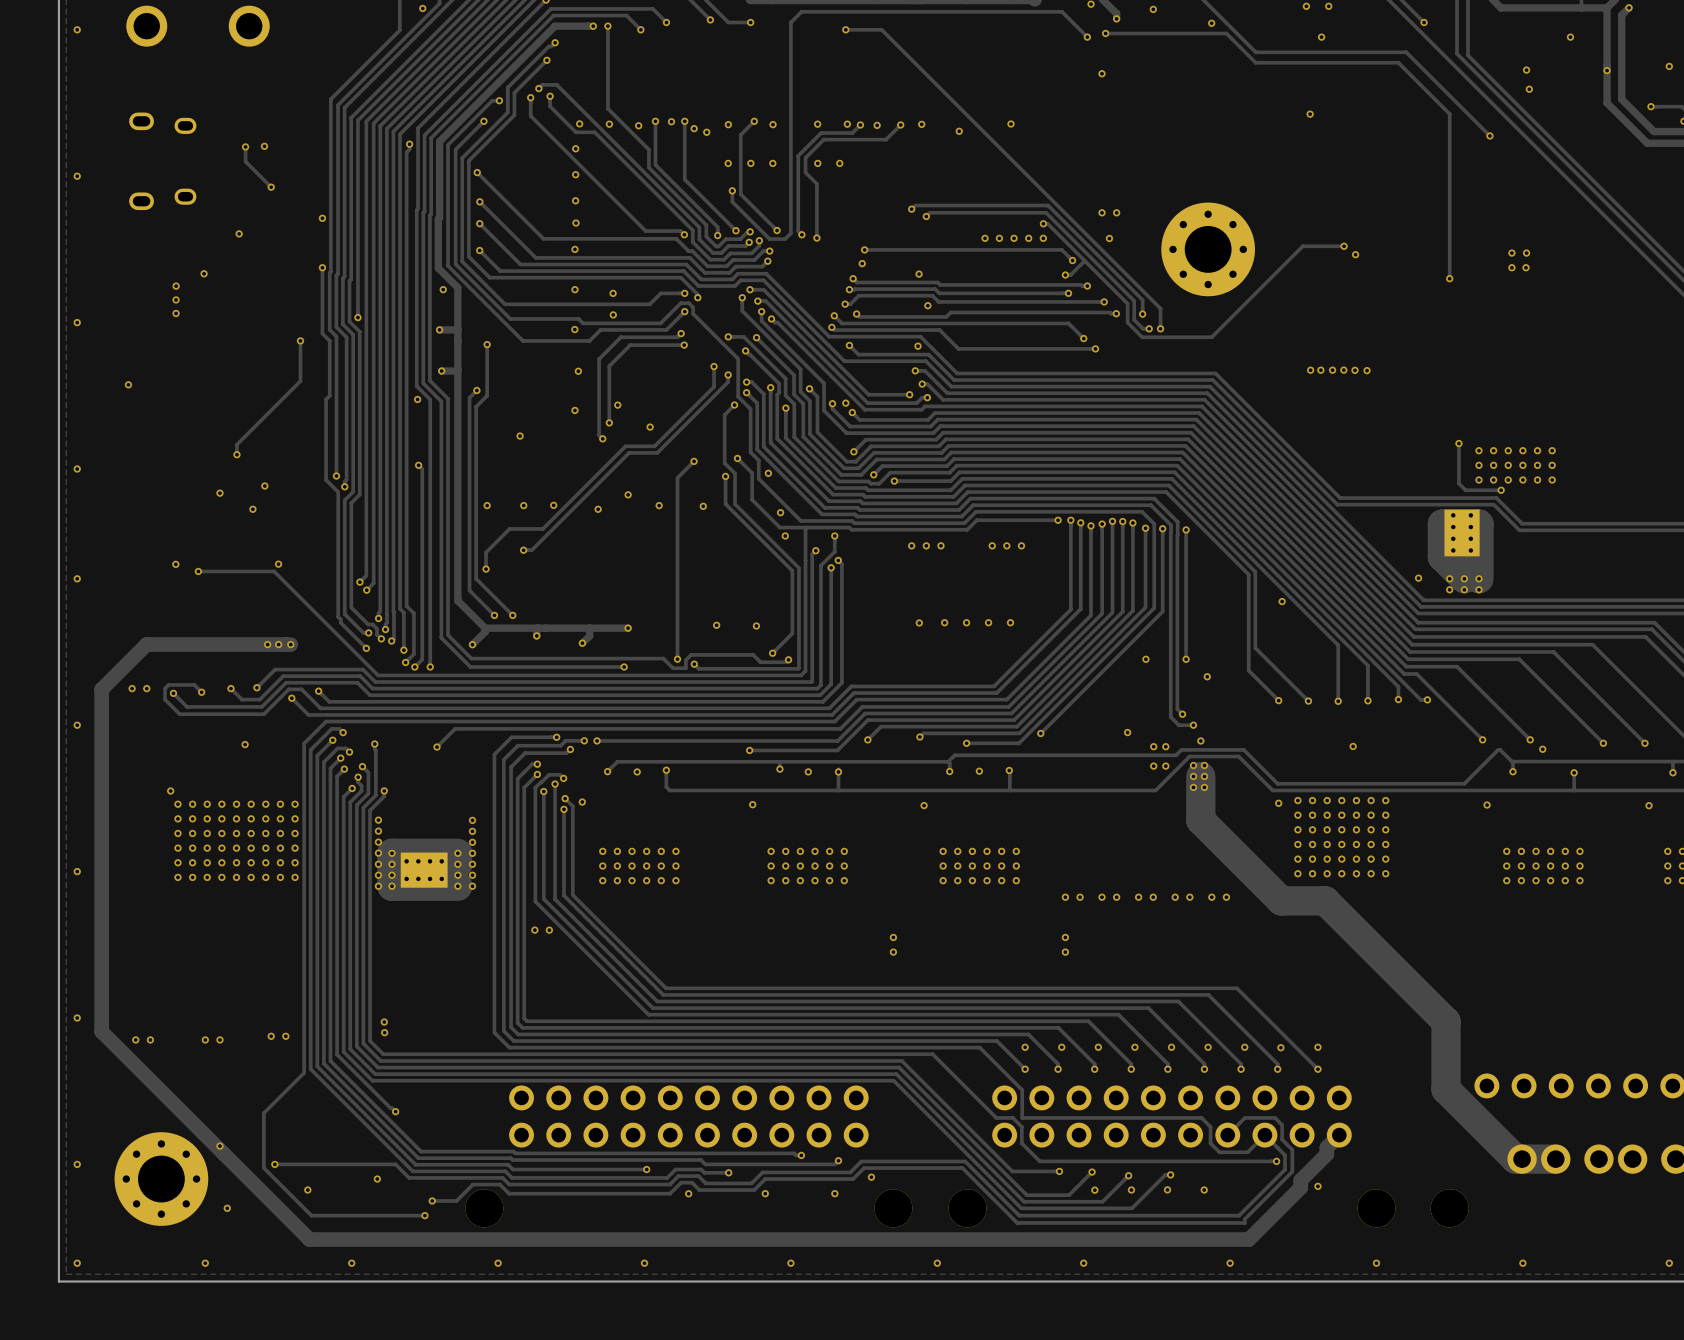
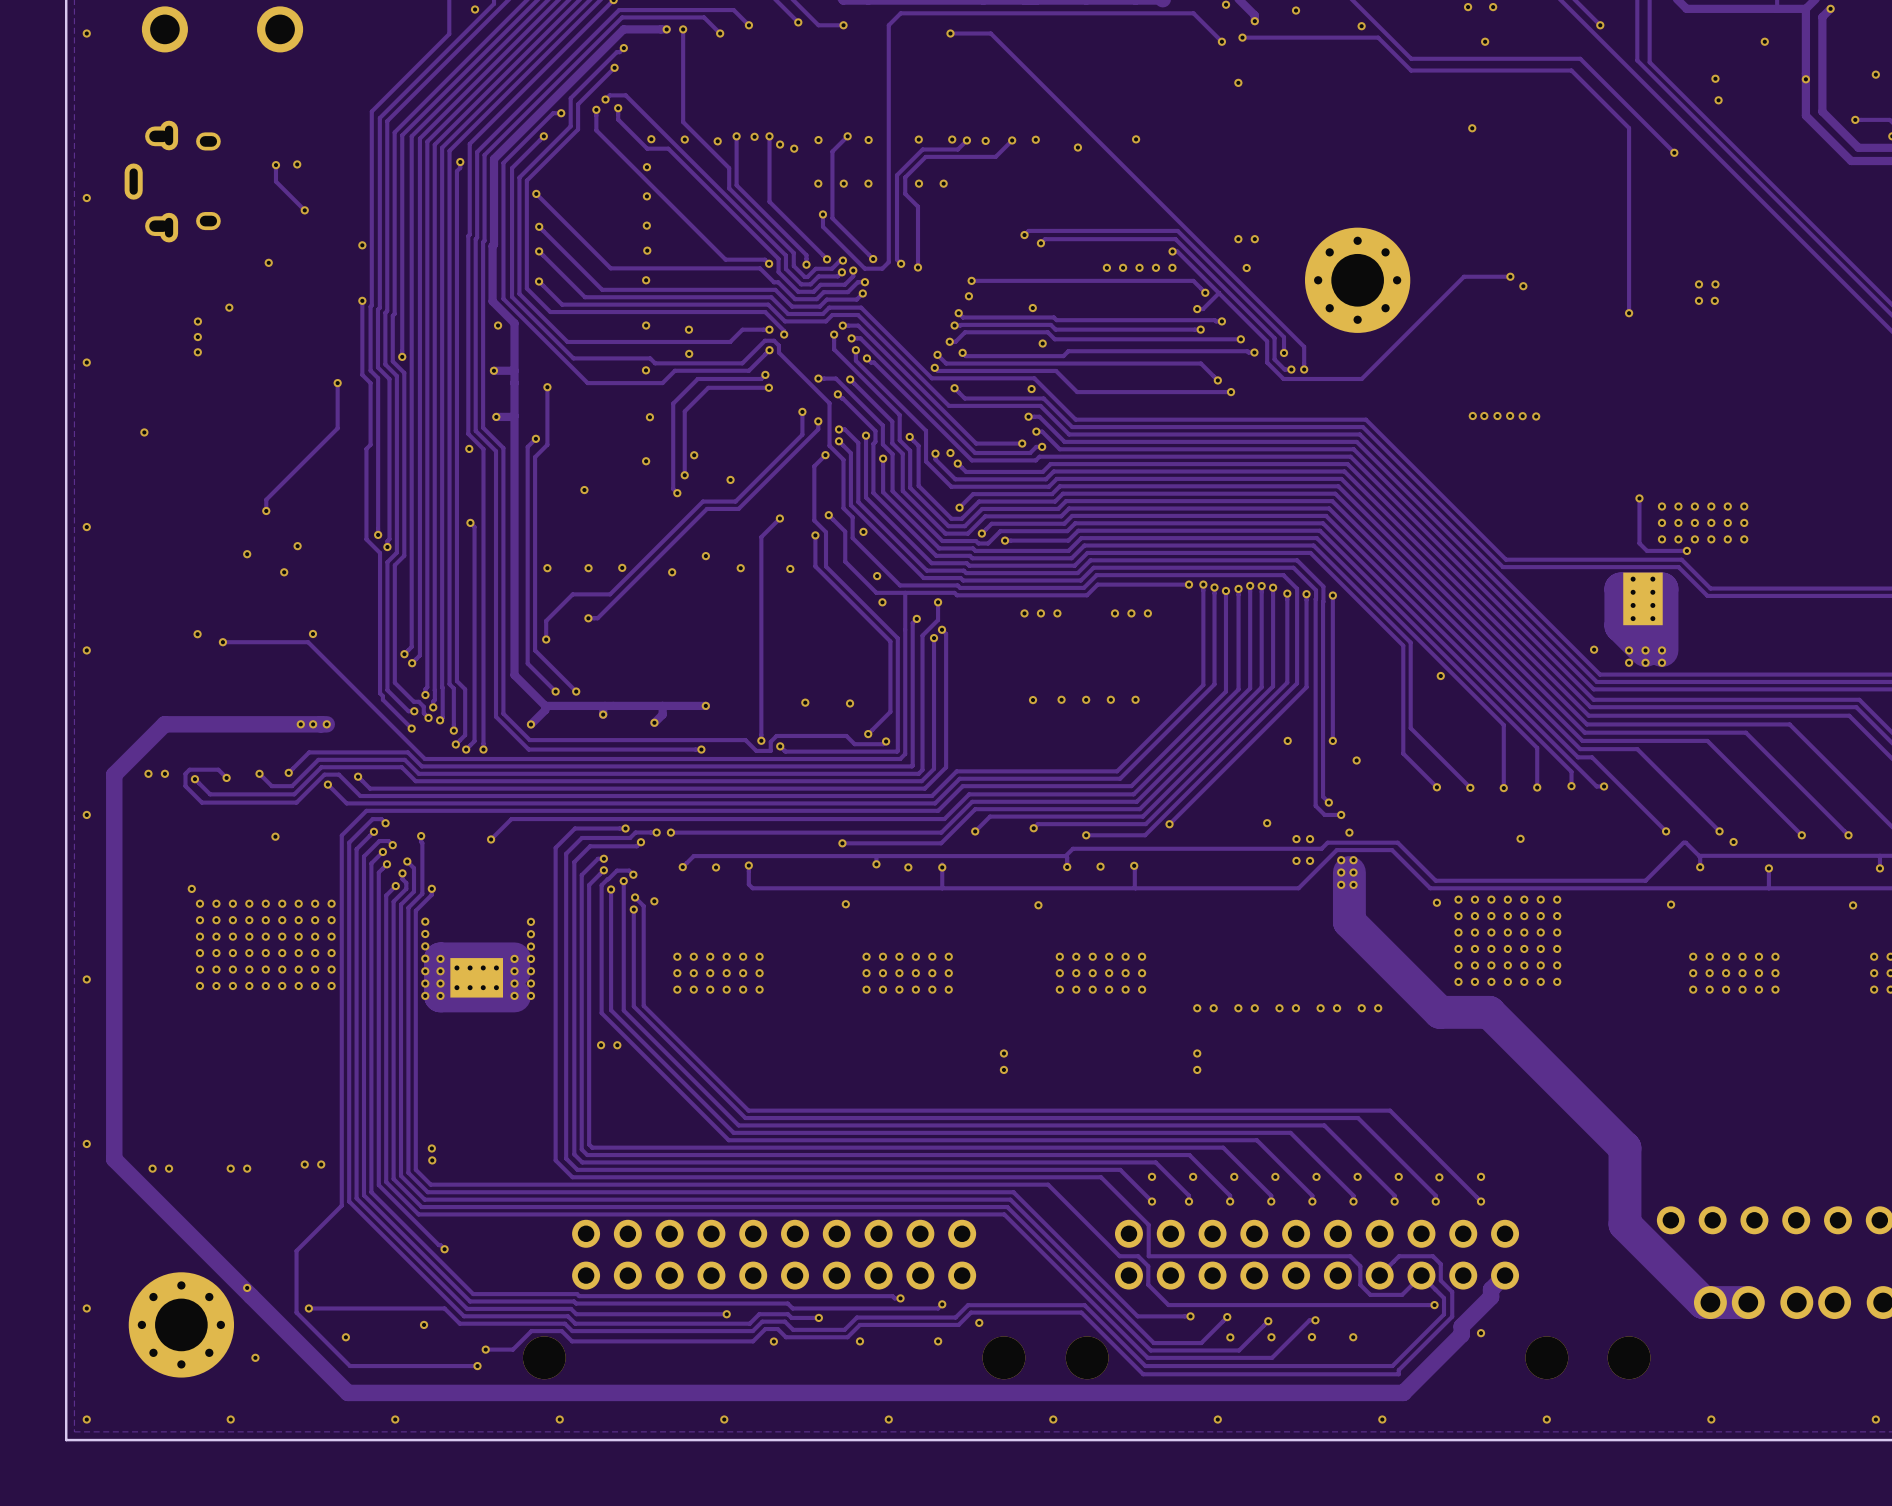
part: none -> (151, 181)

